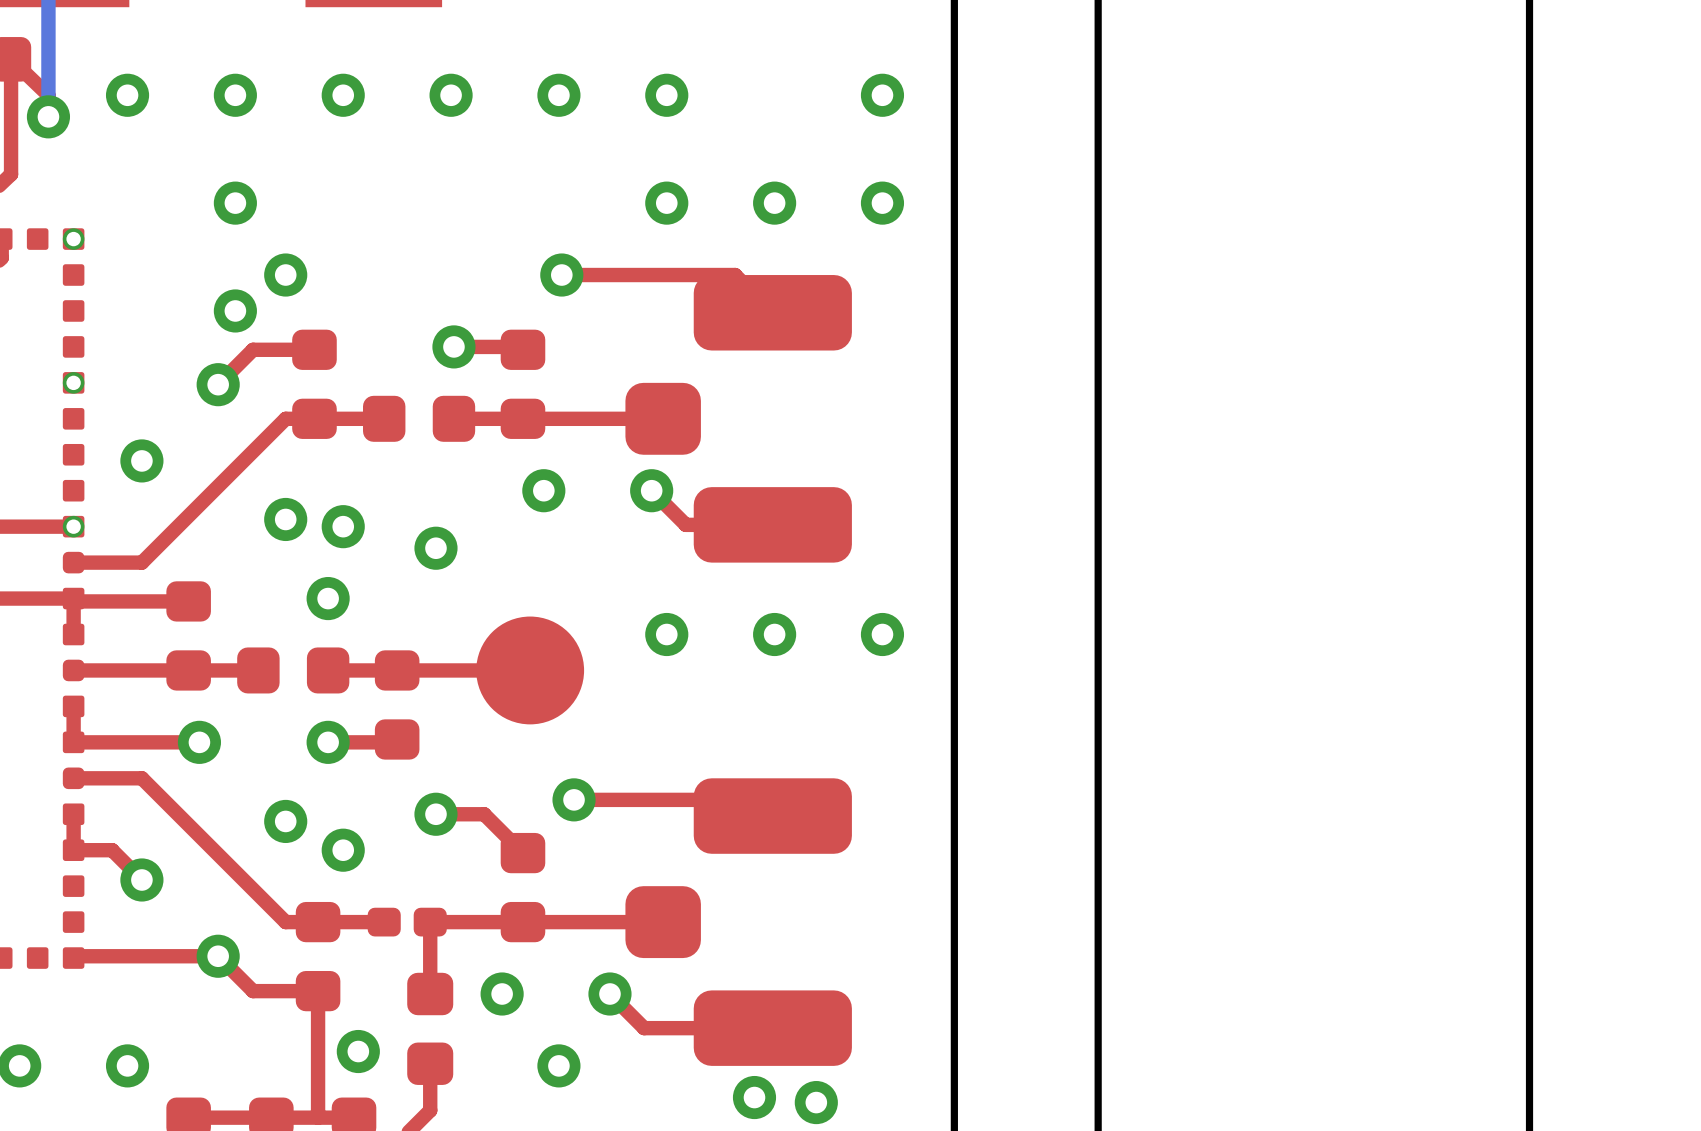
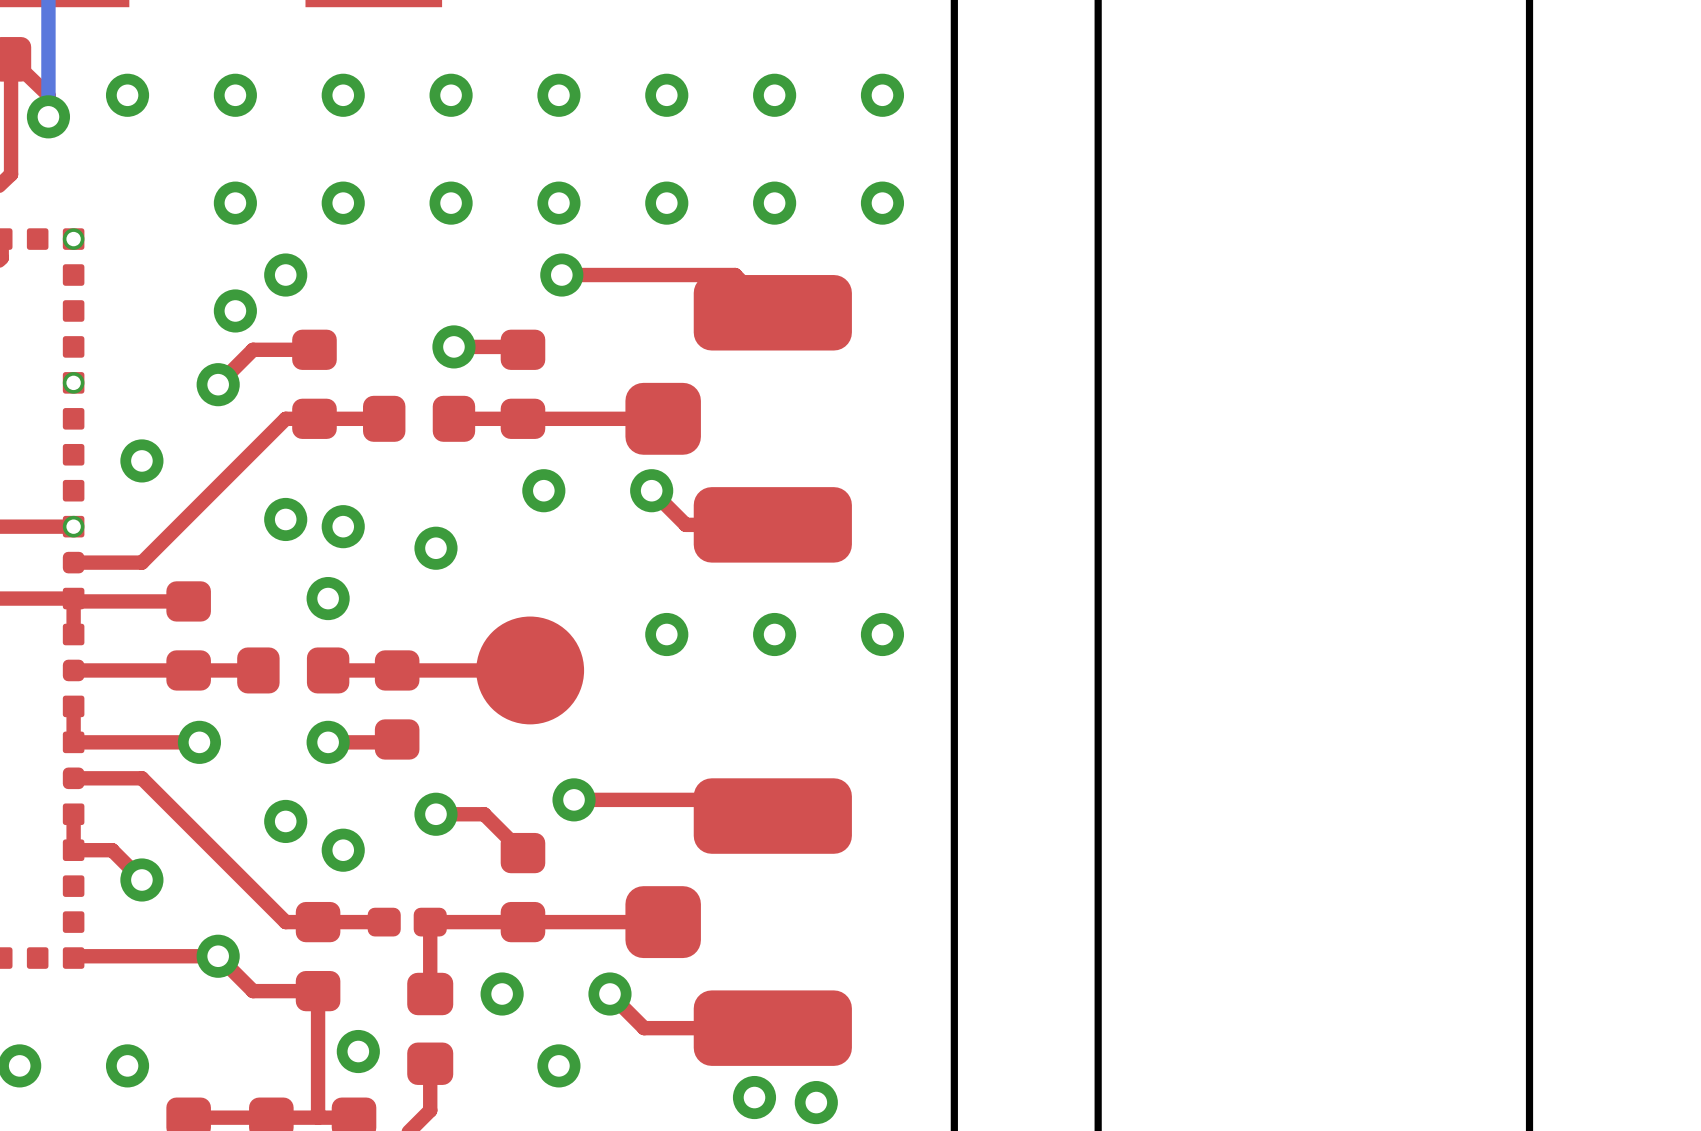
via: none -> (774, 95)
via: none -> (343, 203)
via: none -> (451, 203)
via: none -> (558, 203)

